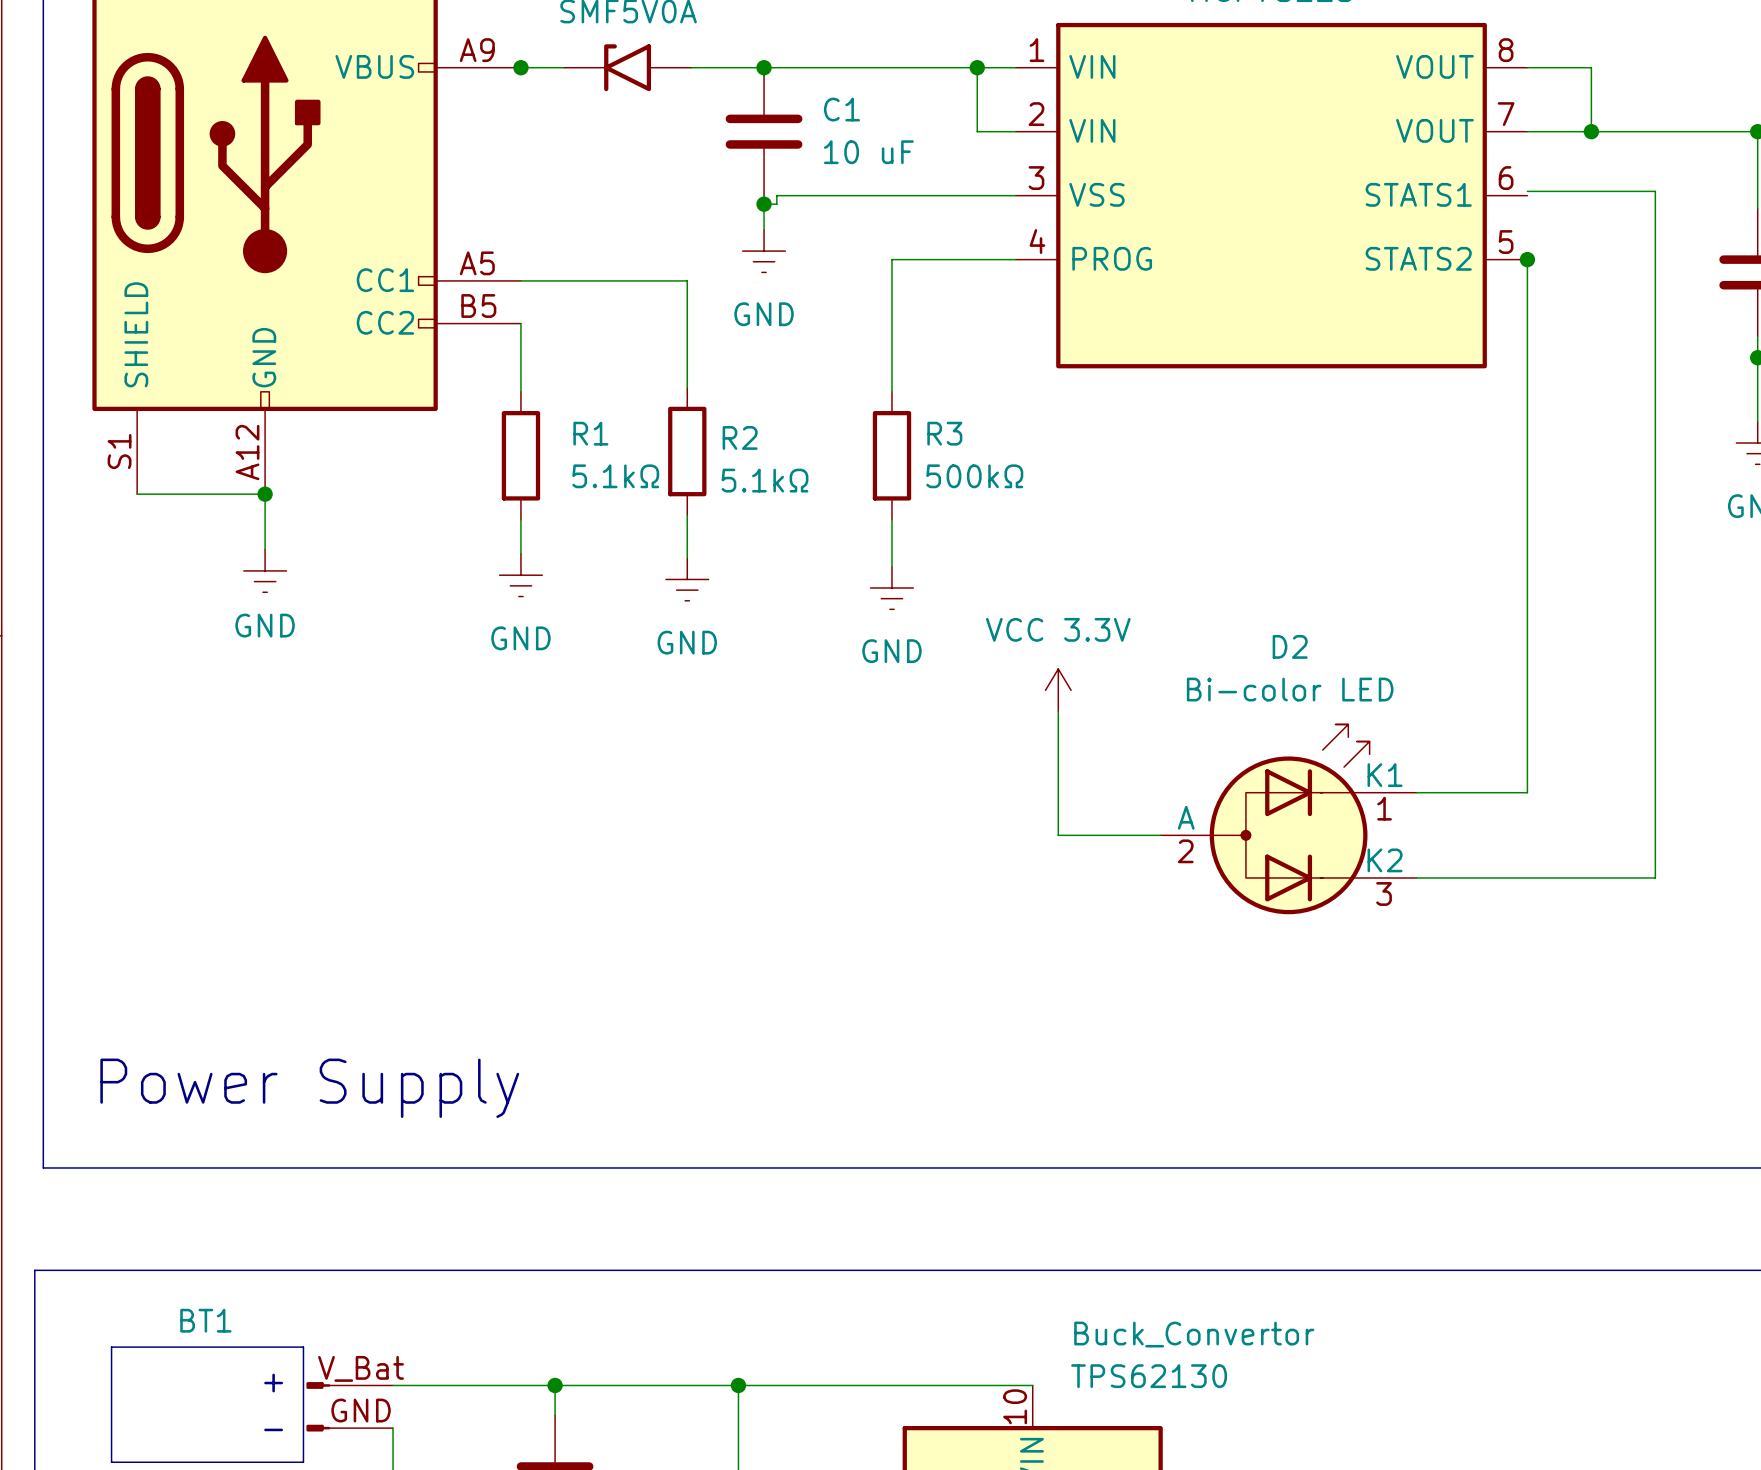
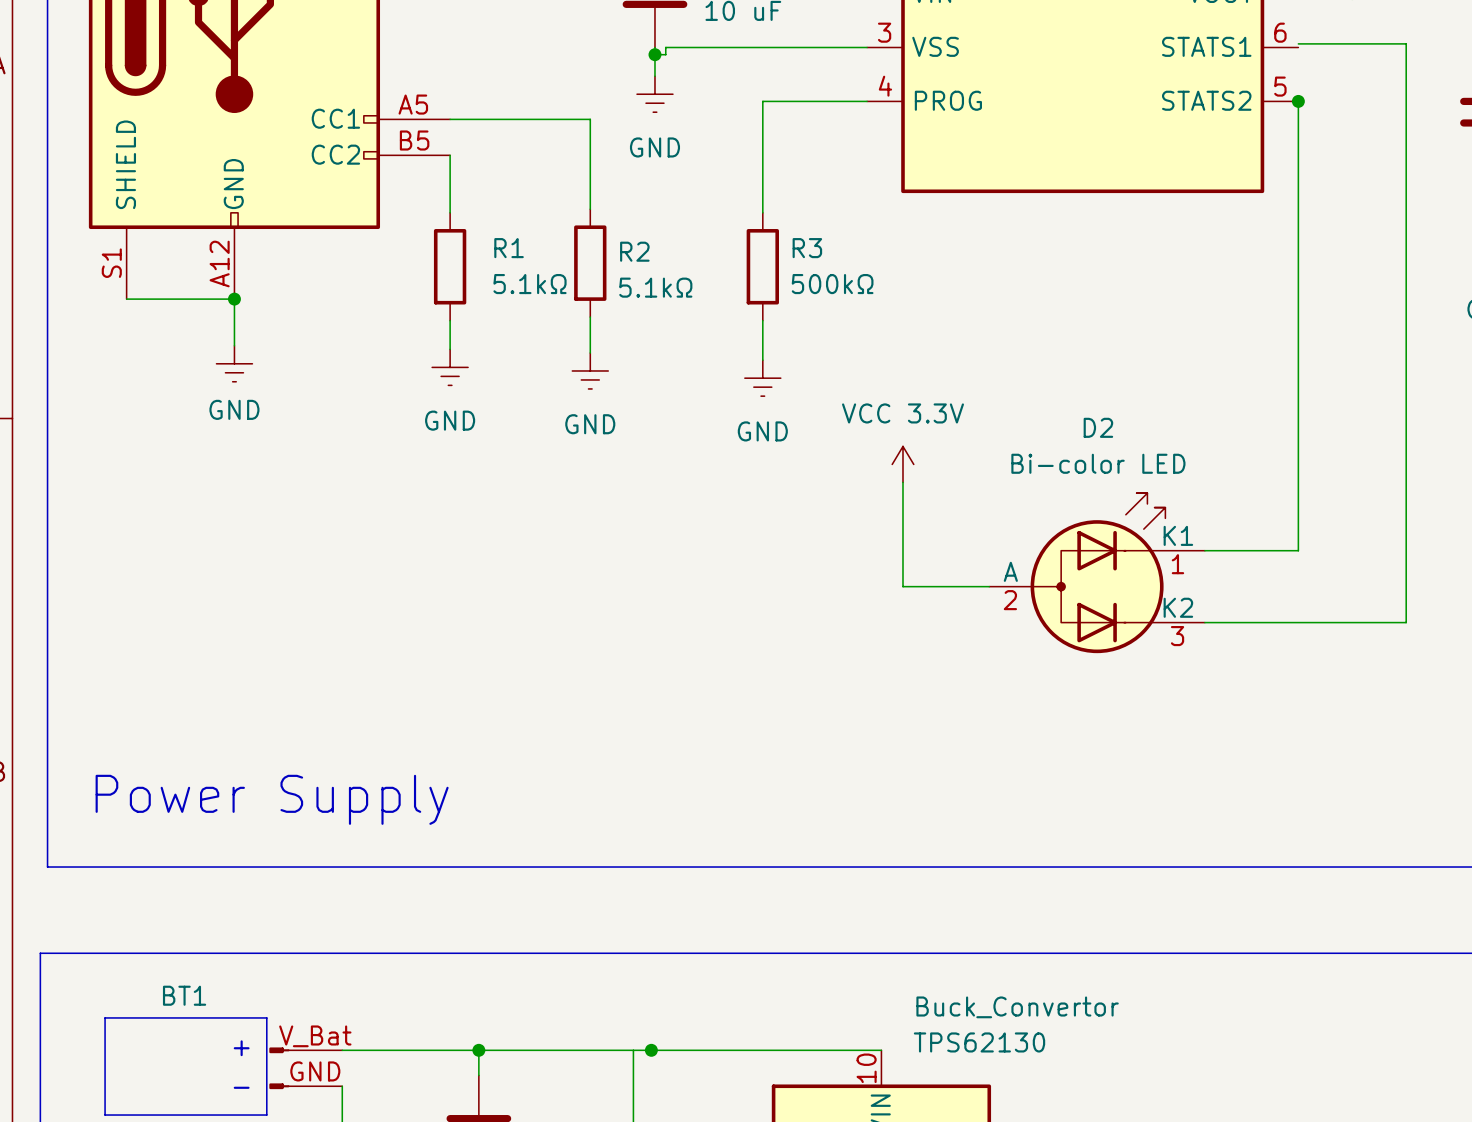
junction position: (738, 1385) -> (651, 1050)

